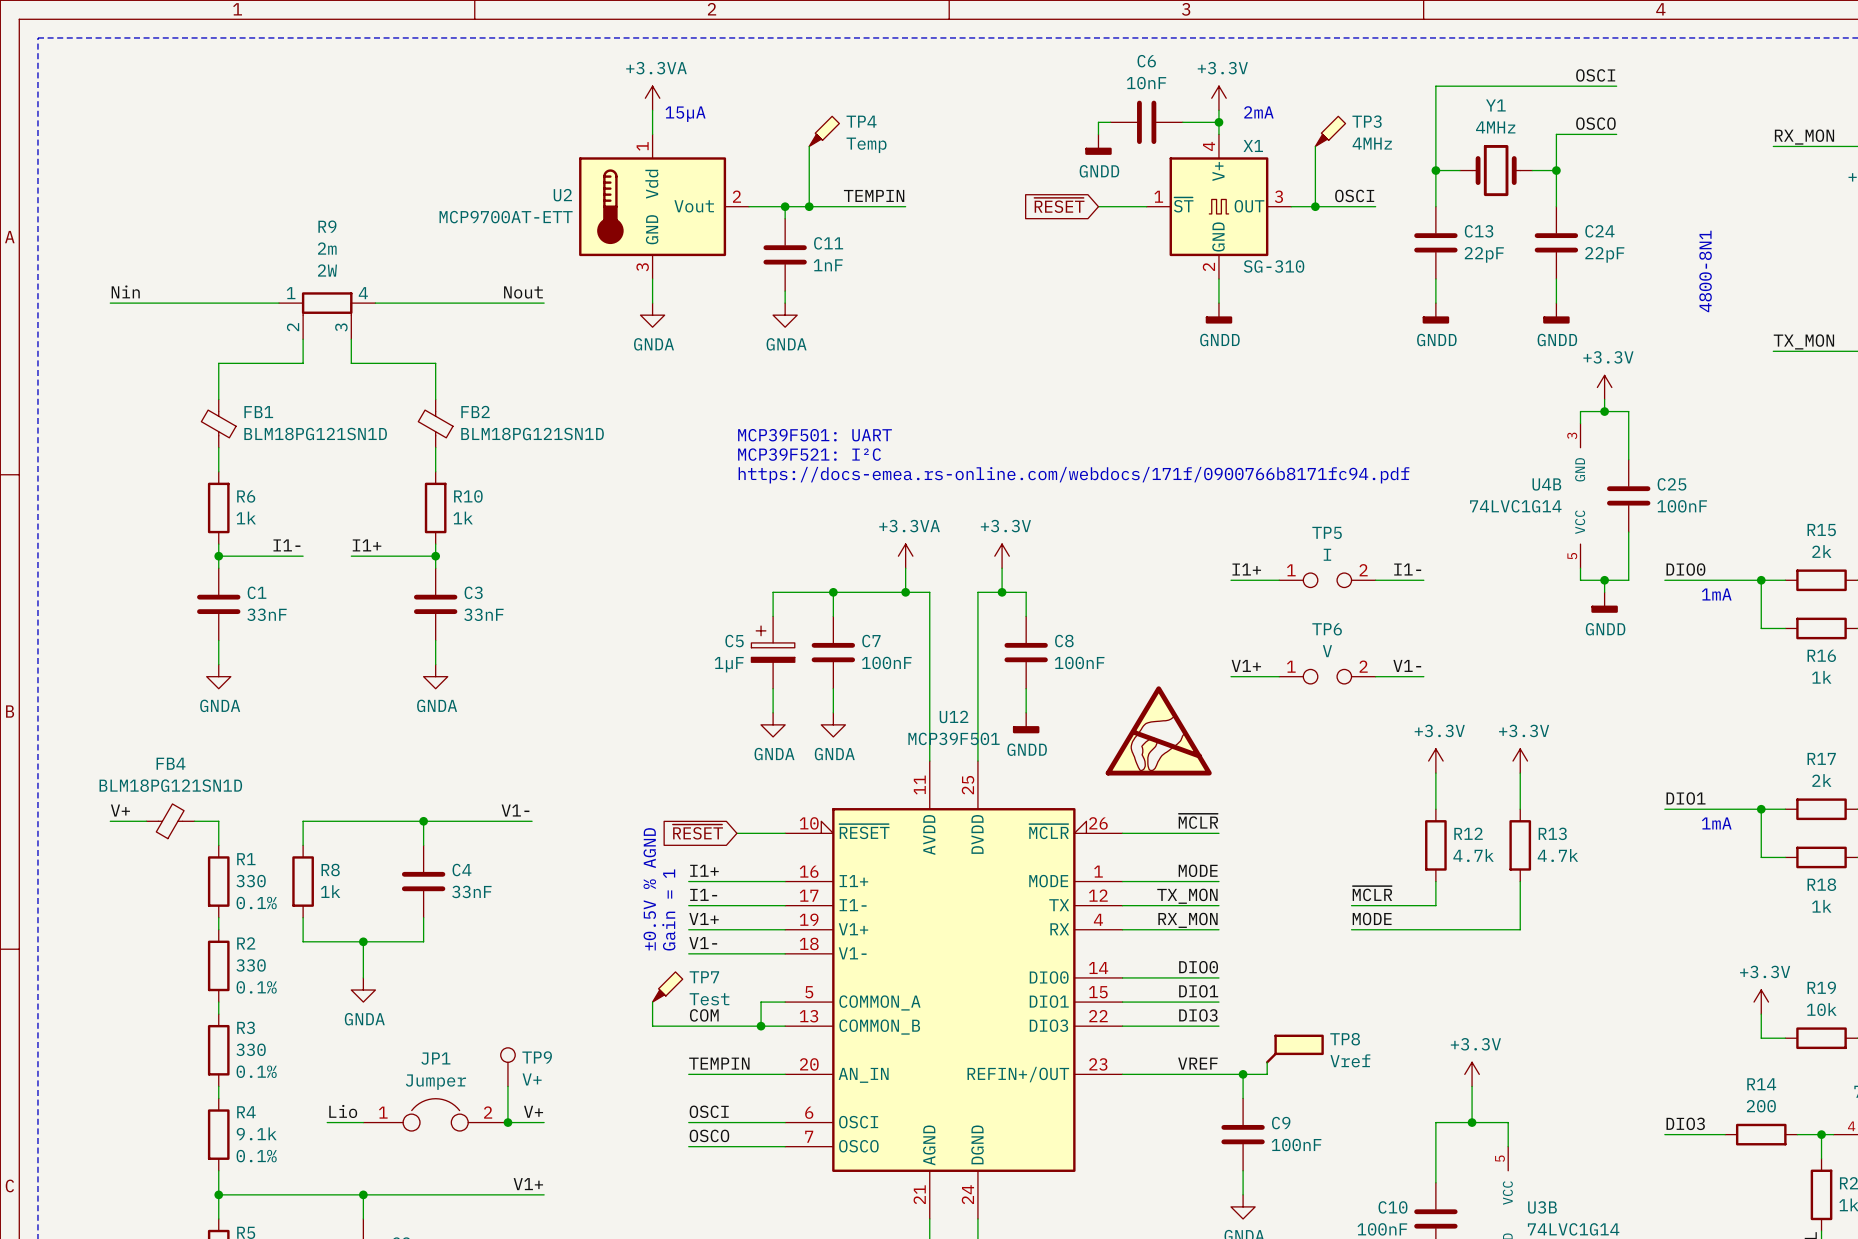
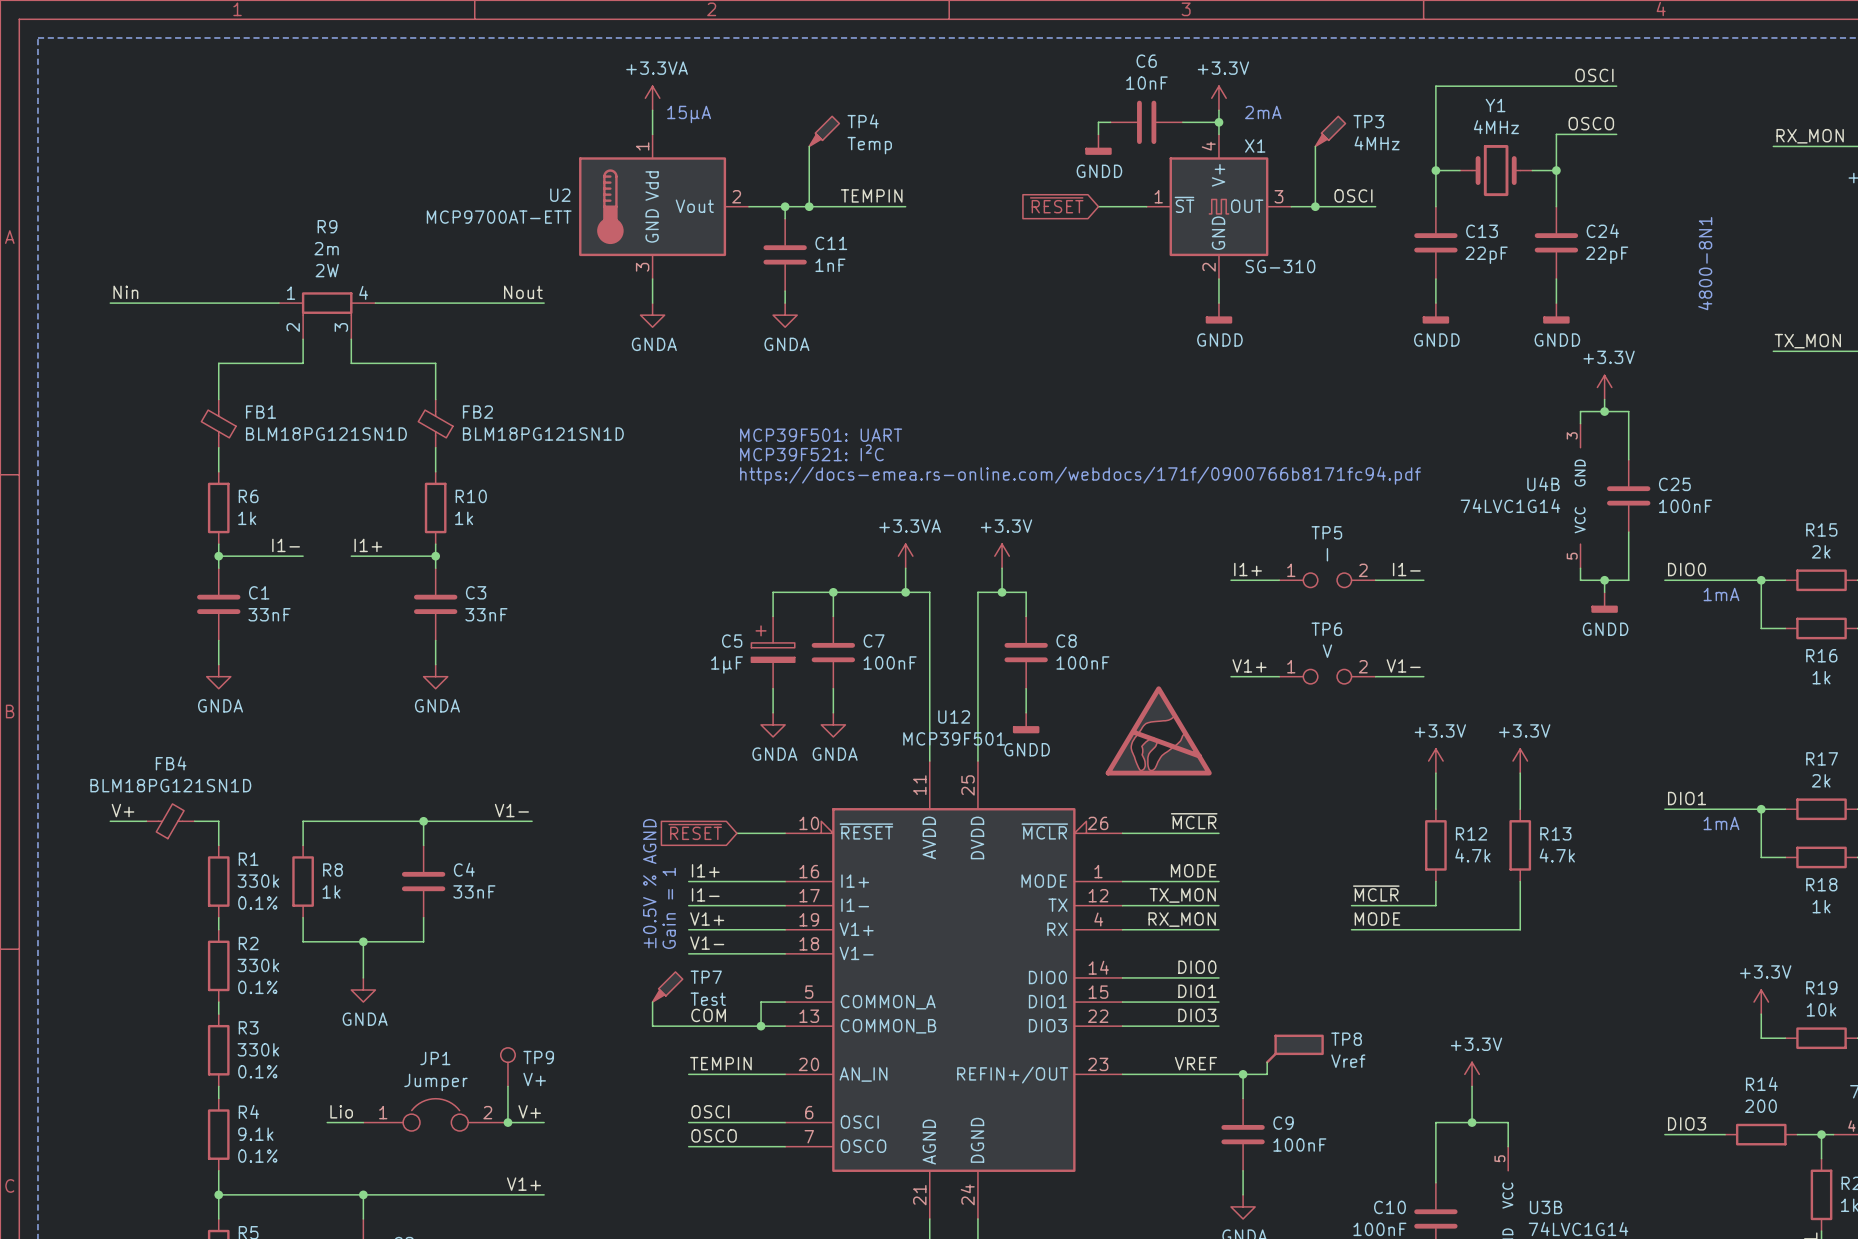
R1 value: 330 (251, 881) -> 330k (258, 881)
R2 value: 330 (251, 965) -> 330k (258, 965)
R3 value: 330 (251, 1049) -> 330k (258, 1049)

